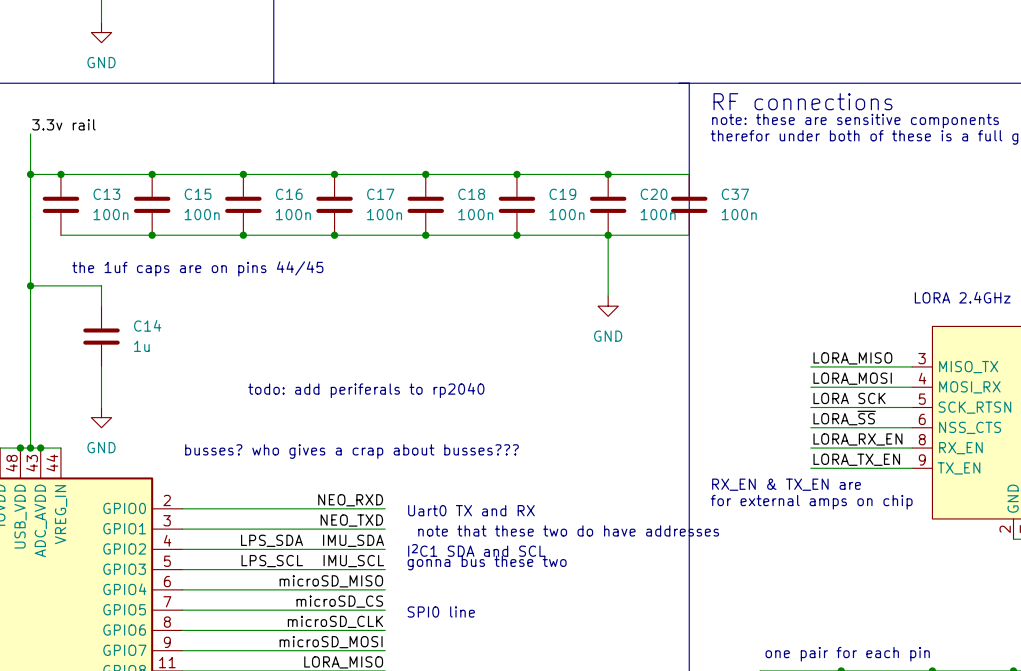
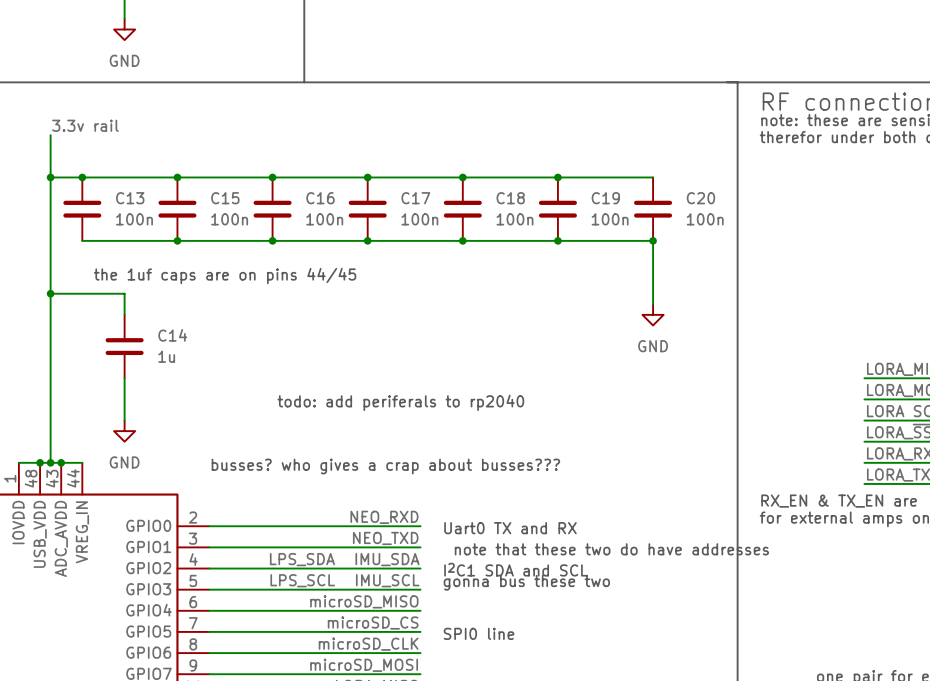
wire: (608, 174) (689, 174) -> none
junction: (608, 174) -> none
C37: 100n (689, 204) -> none
wire: (608, 235) (689, 235) -> none

